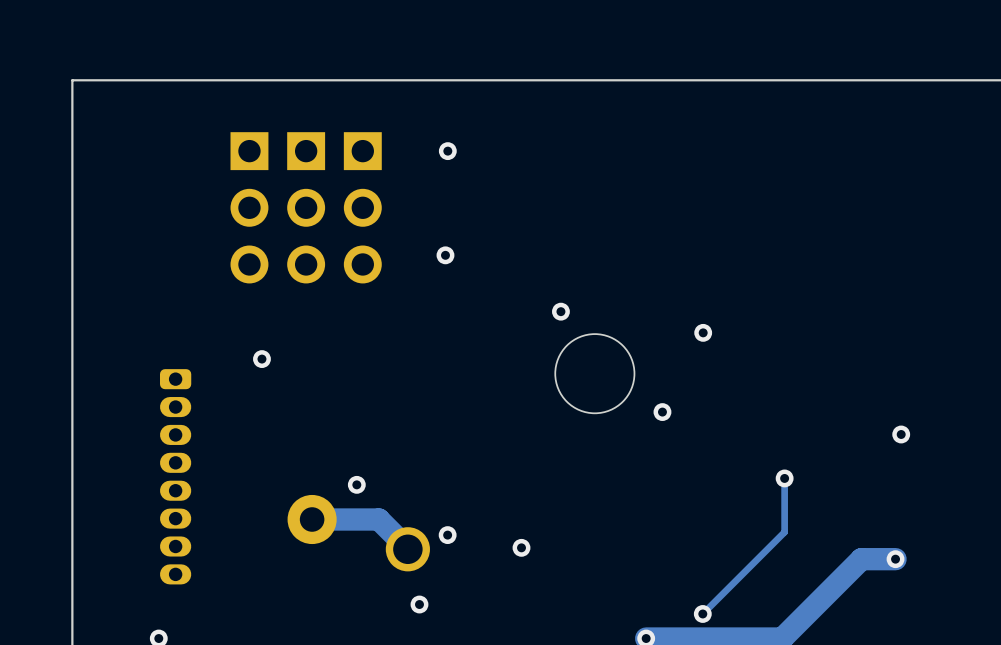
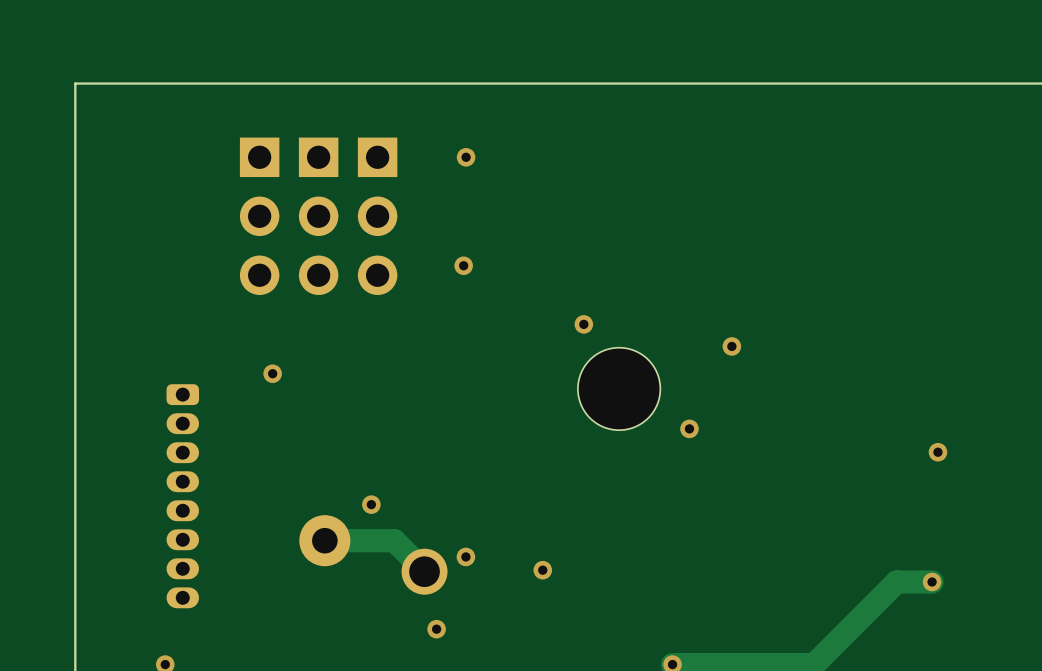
track: (784, 478) (784, 532) (702, 613) -> none
via: (784, 478) -> none
via: (702, 613) -> none

